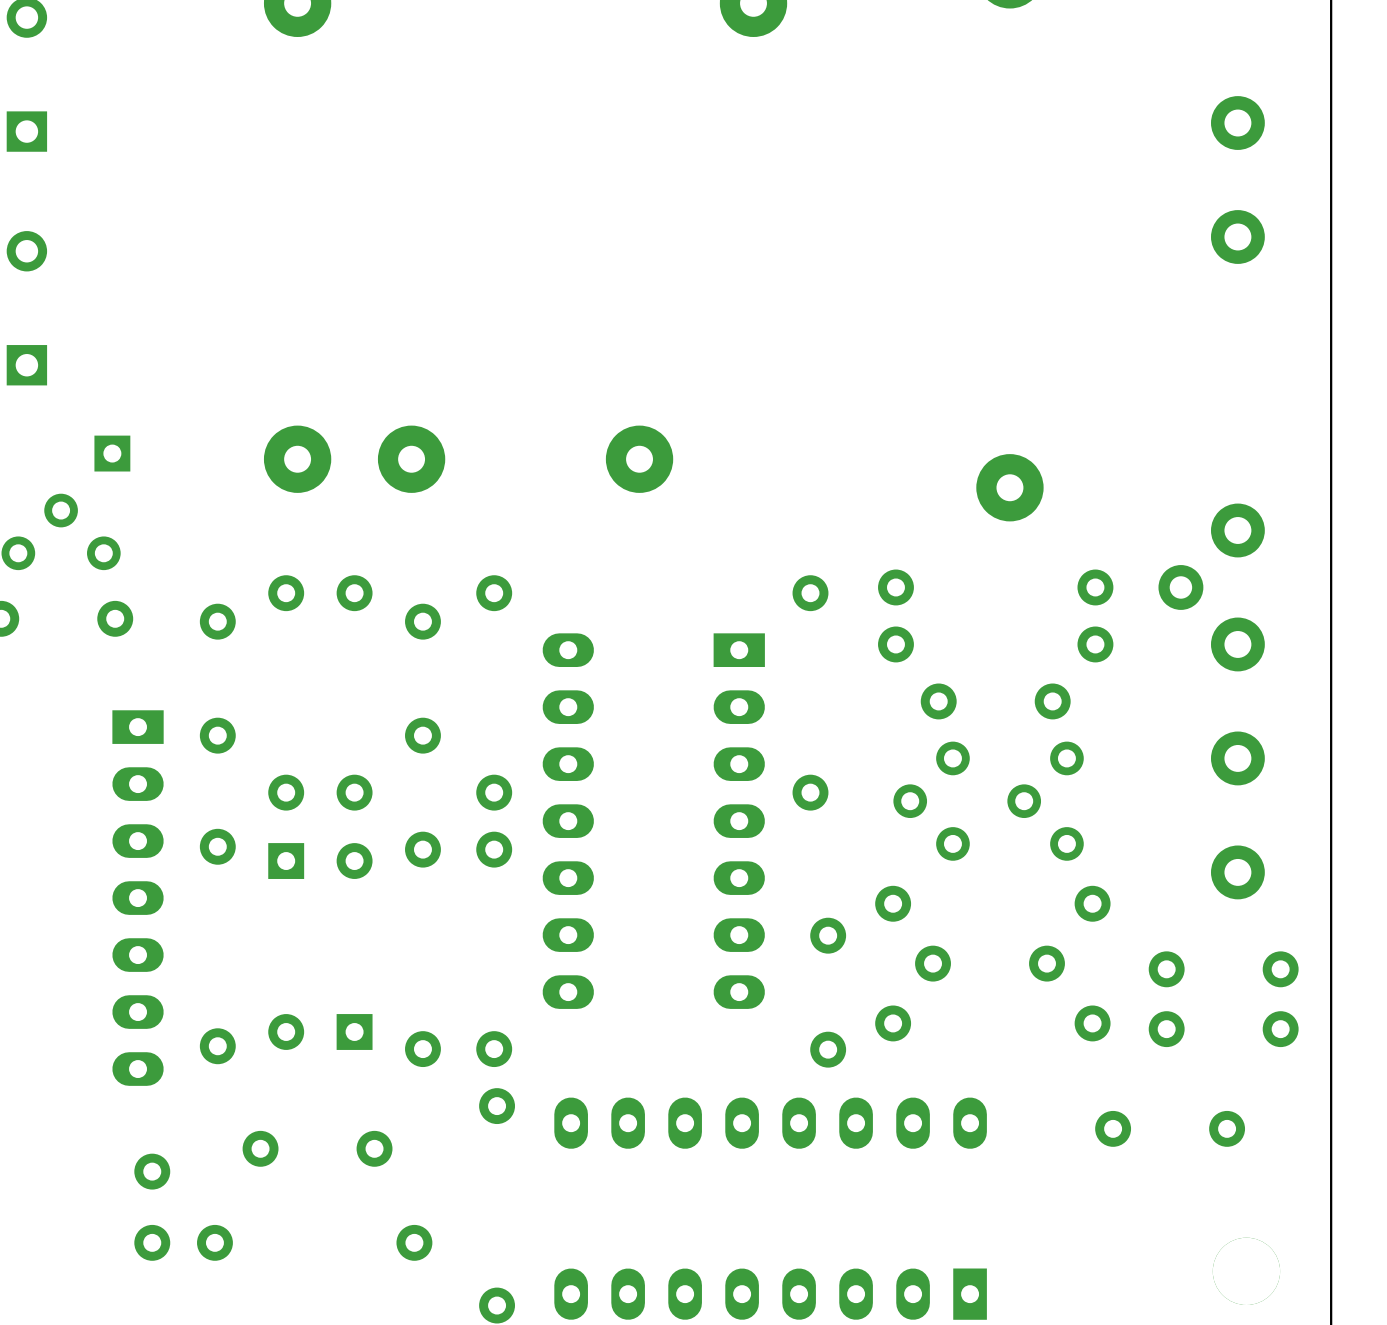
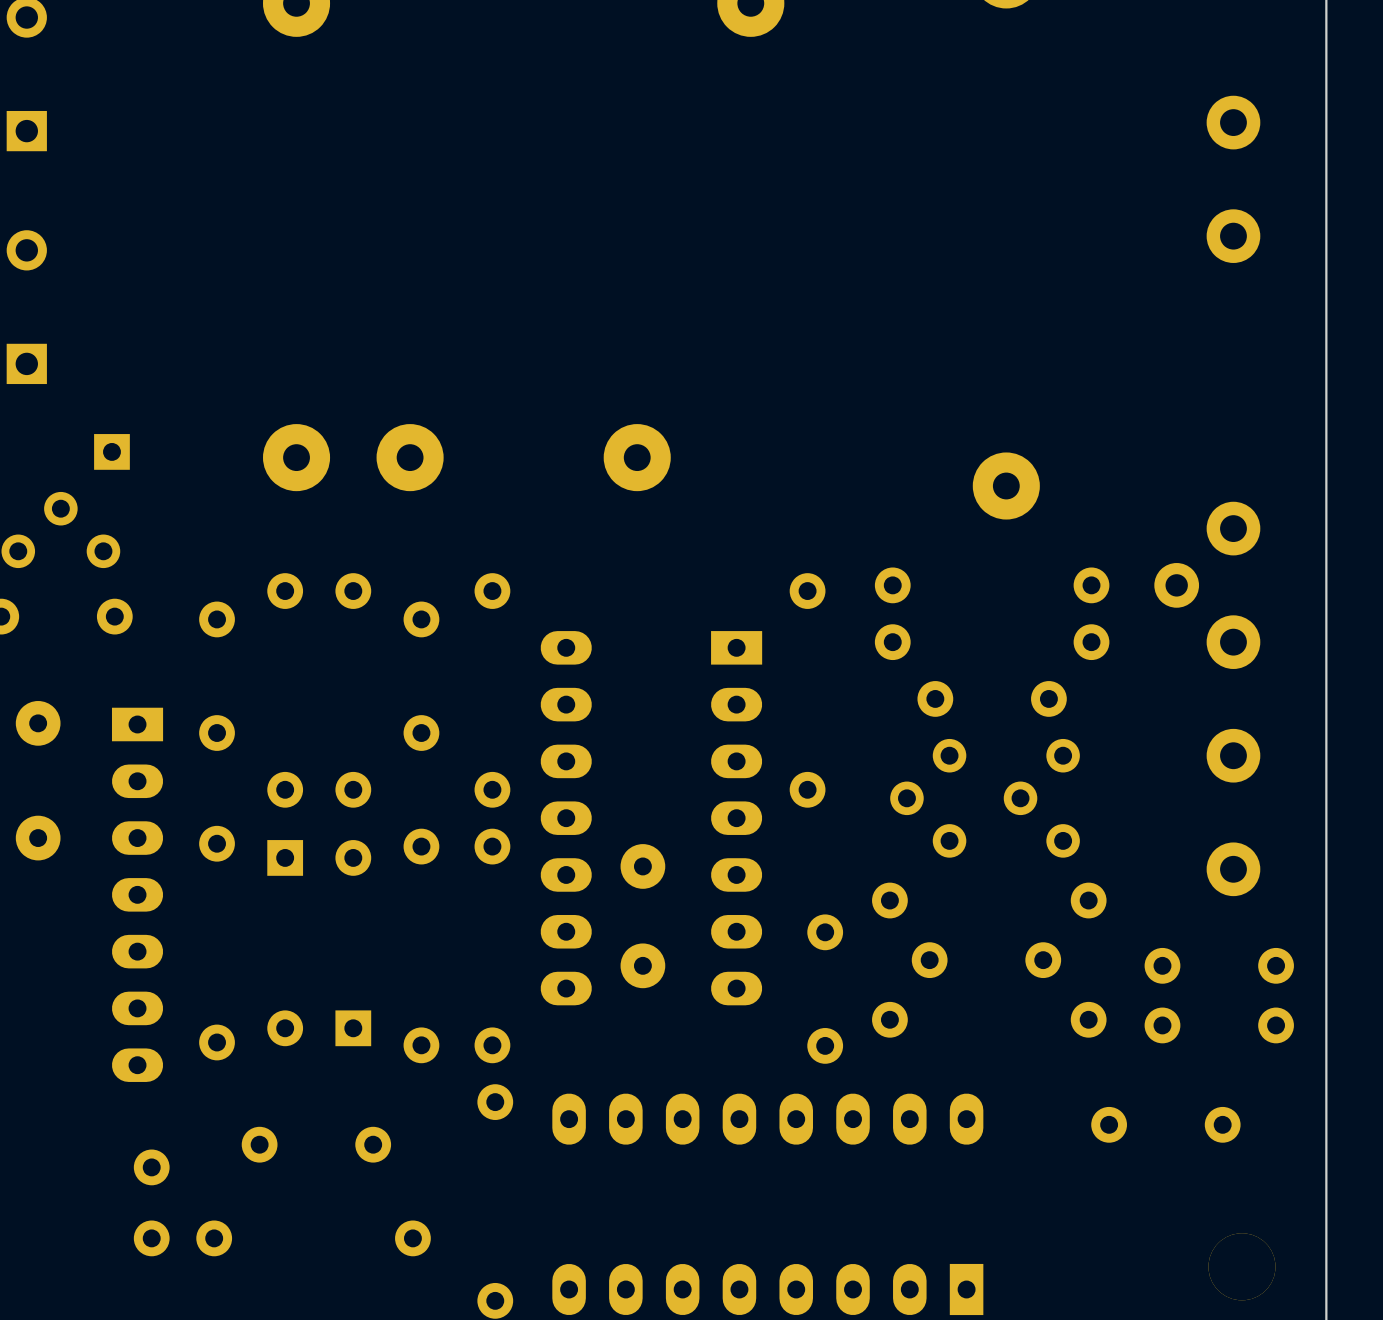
part: none -> (38, 723)
part: none -> (38, 838)
part: none -> (642, 866)
part: none -> (642, 965)

